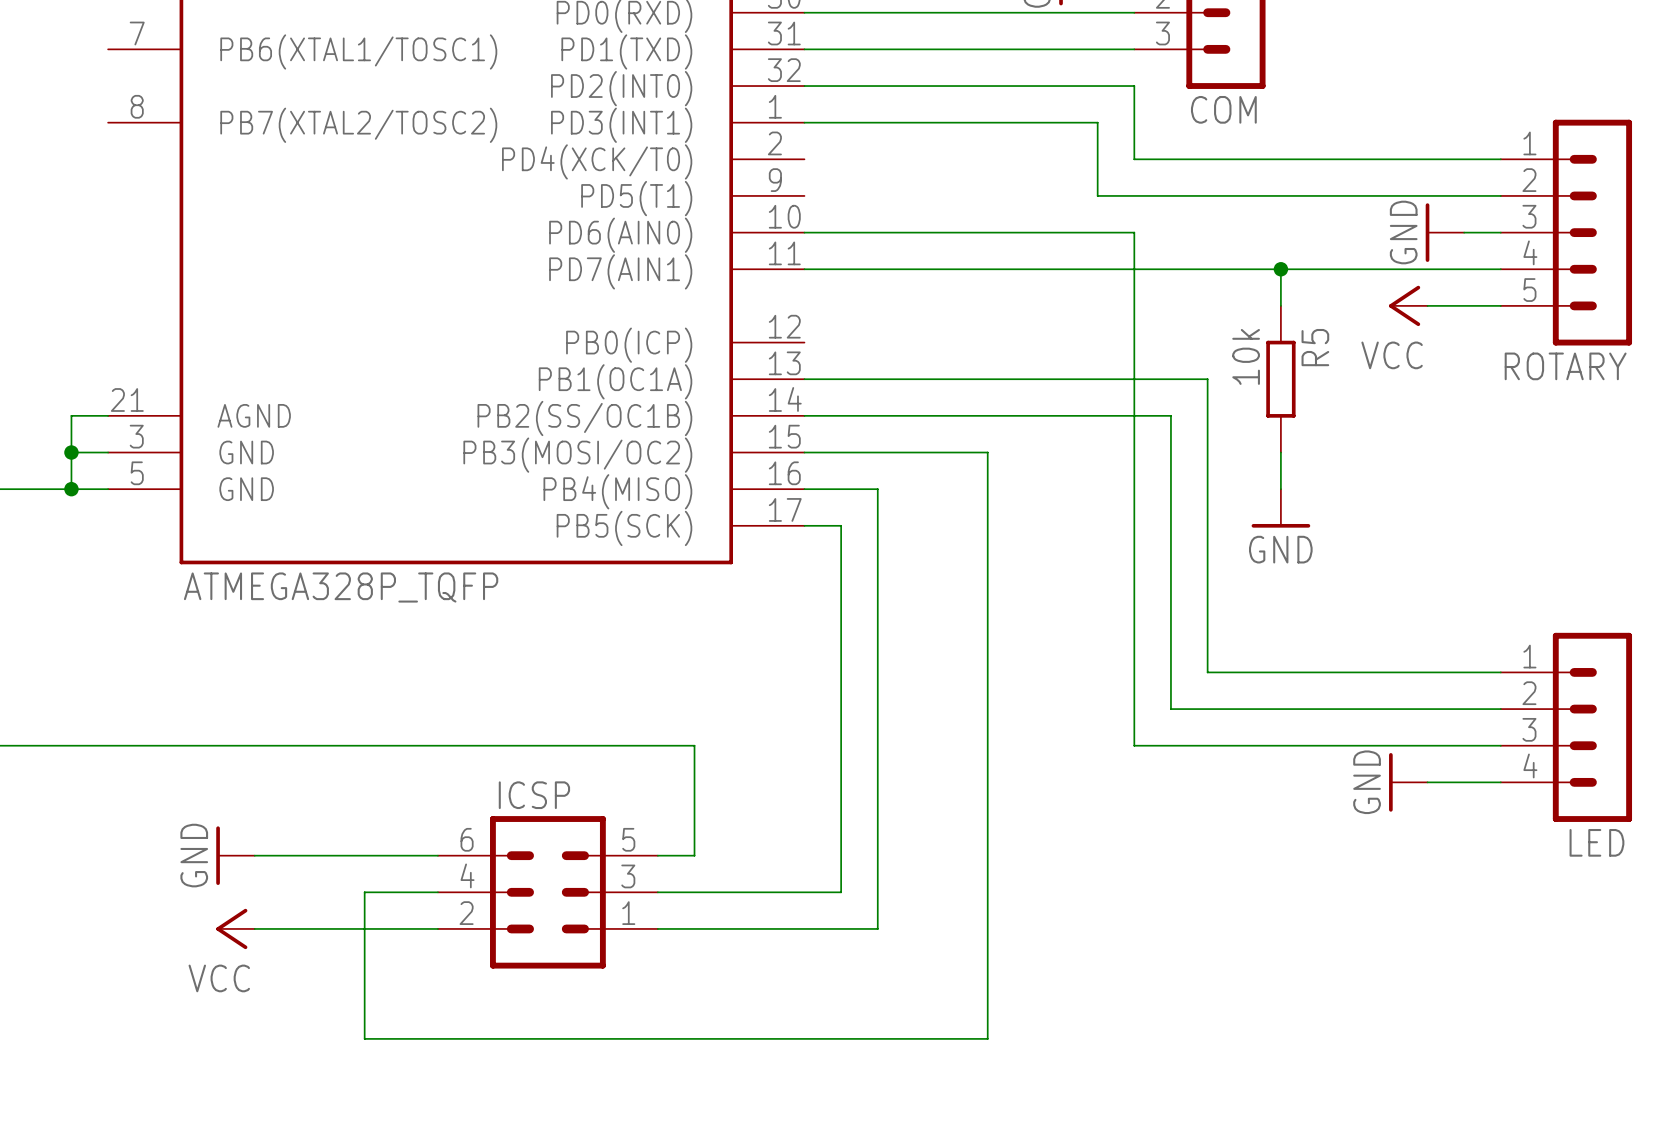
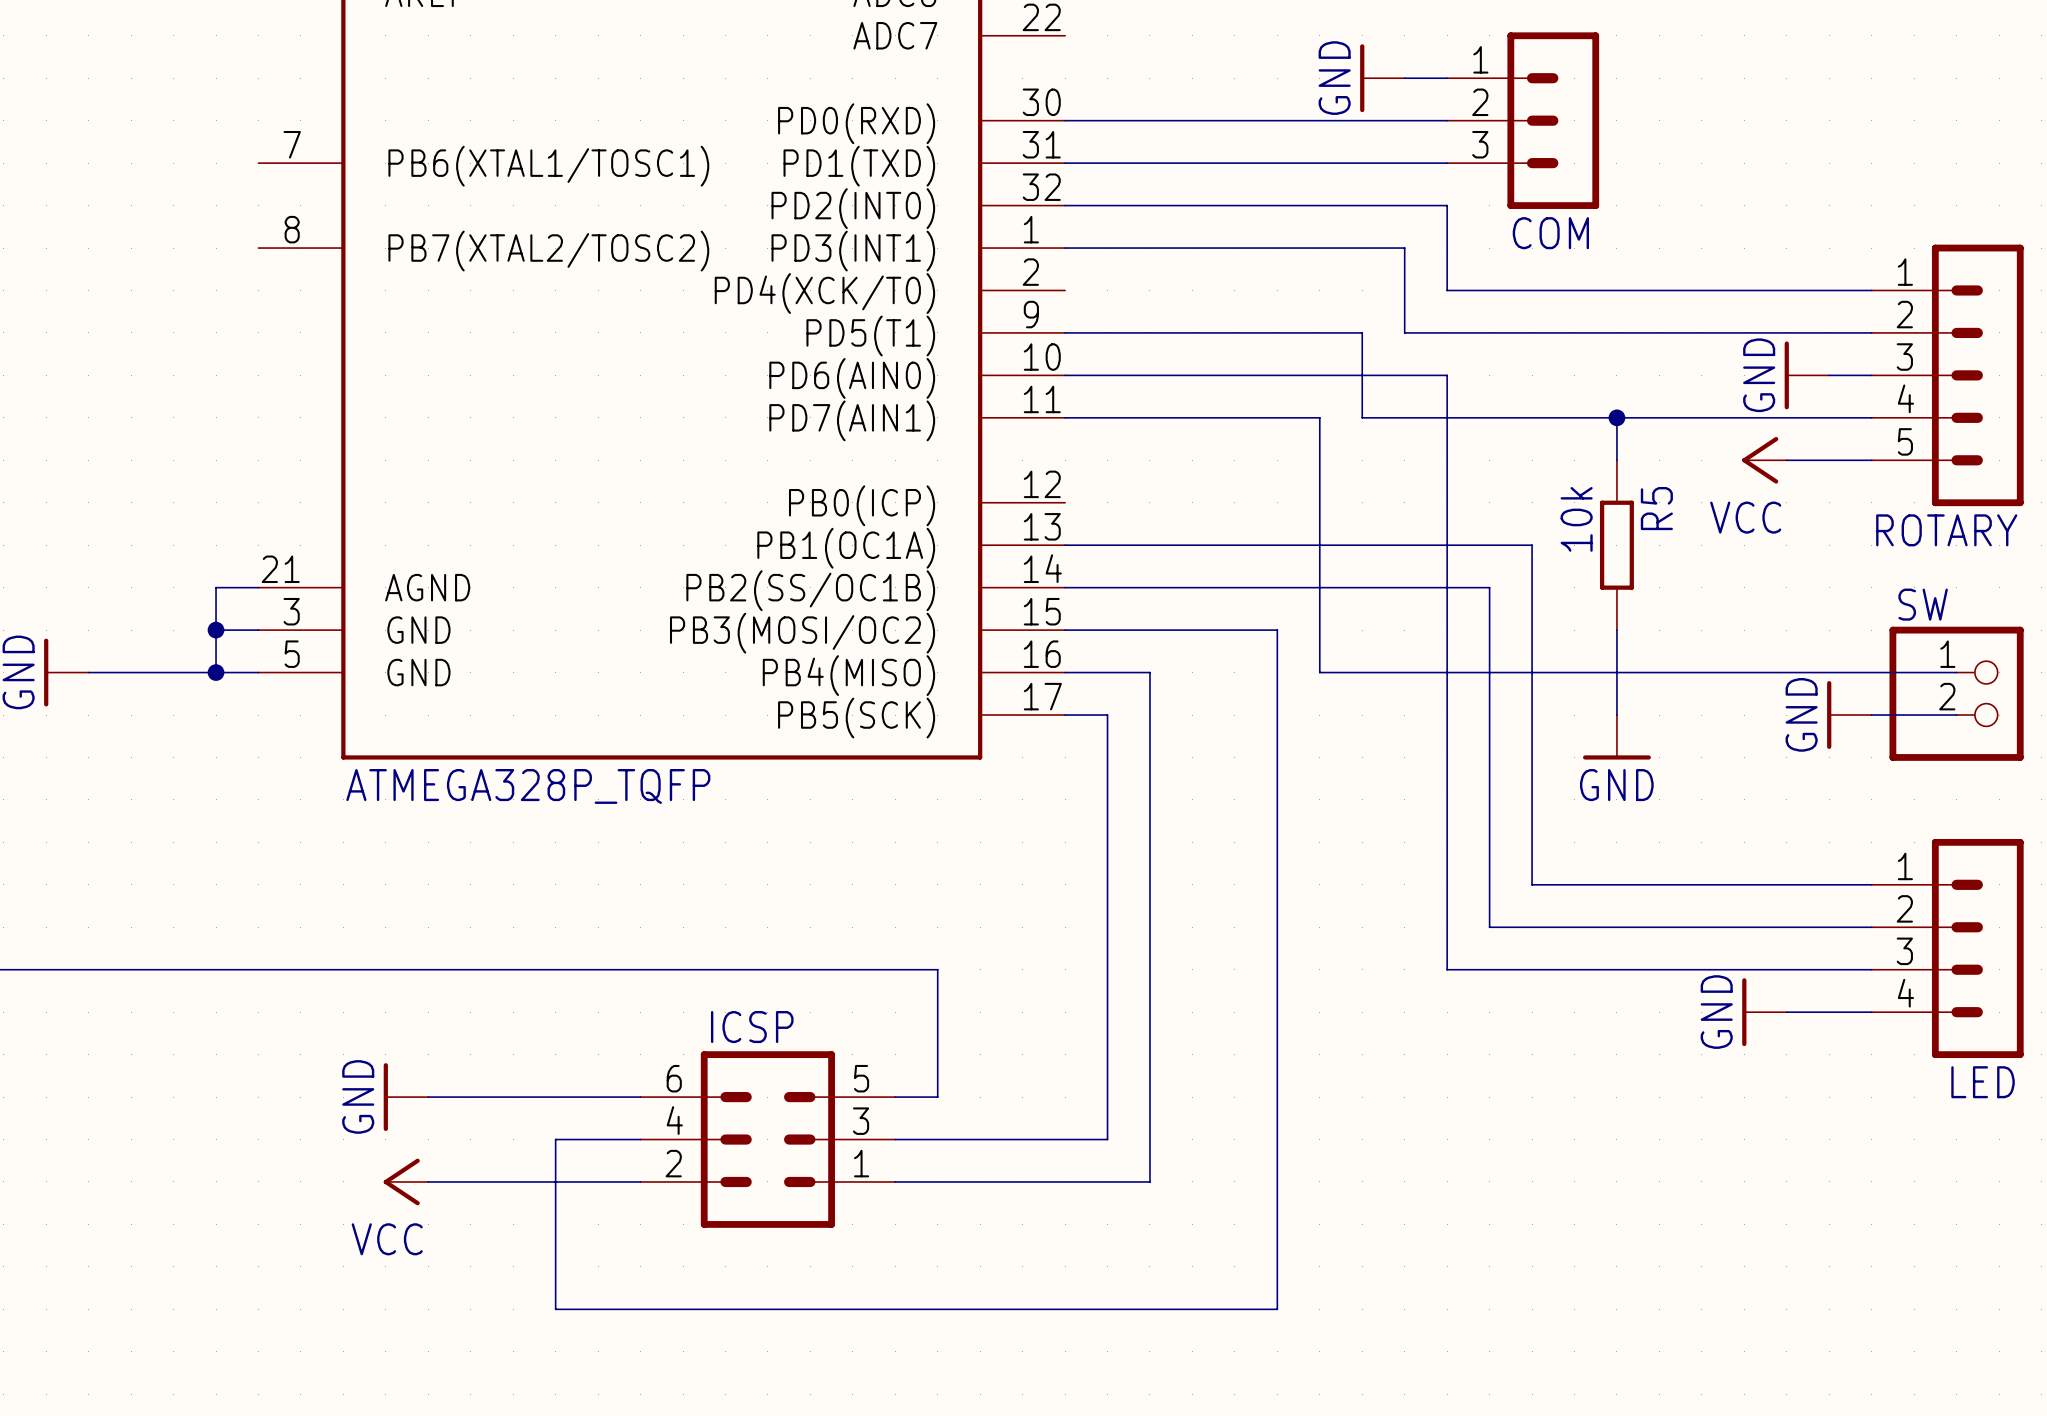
wire: (1024, 269) (1061, 269) -> (1065, 332) (1362, 332) (1362, 417)
wire: none -> (1319, 417) (1319, 672) (1956, 672)
SW: none -> (1956, 693)
power symbol position: GND (1280, 508) -> GND (1616, 737)
power symbol: none -> GND (1849, 715)
wire: none -> (1871, 715) (1956, 715)

